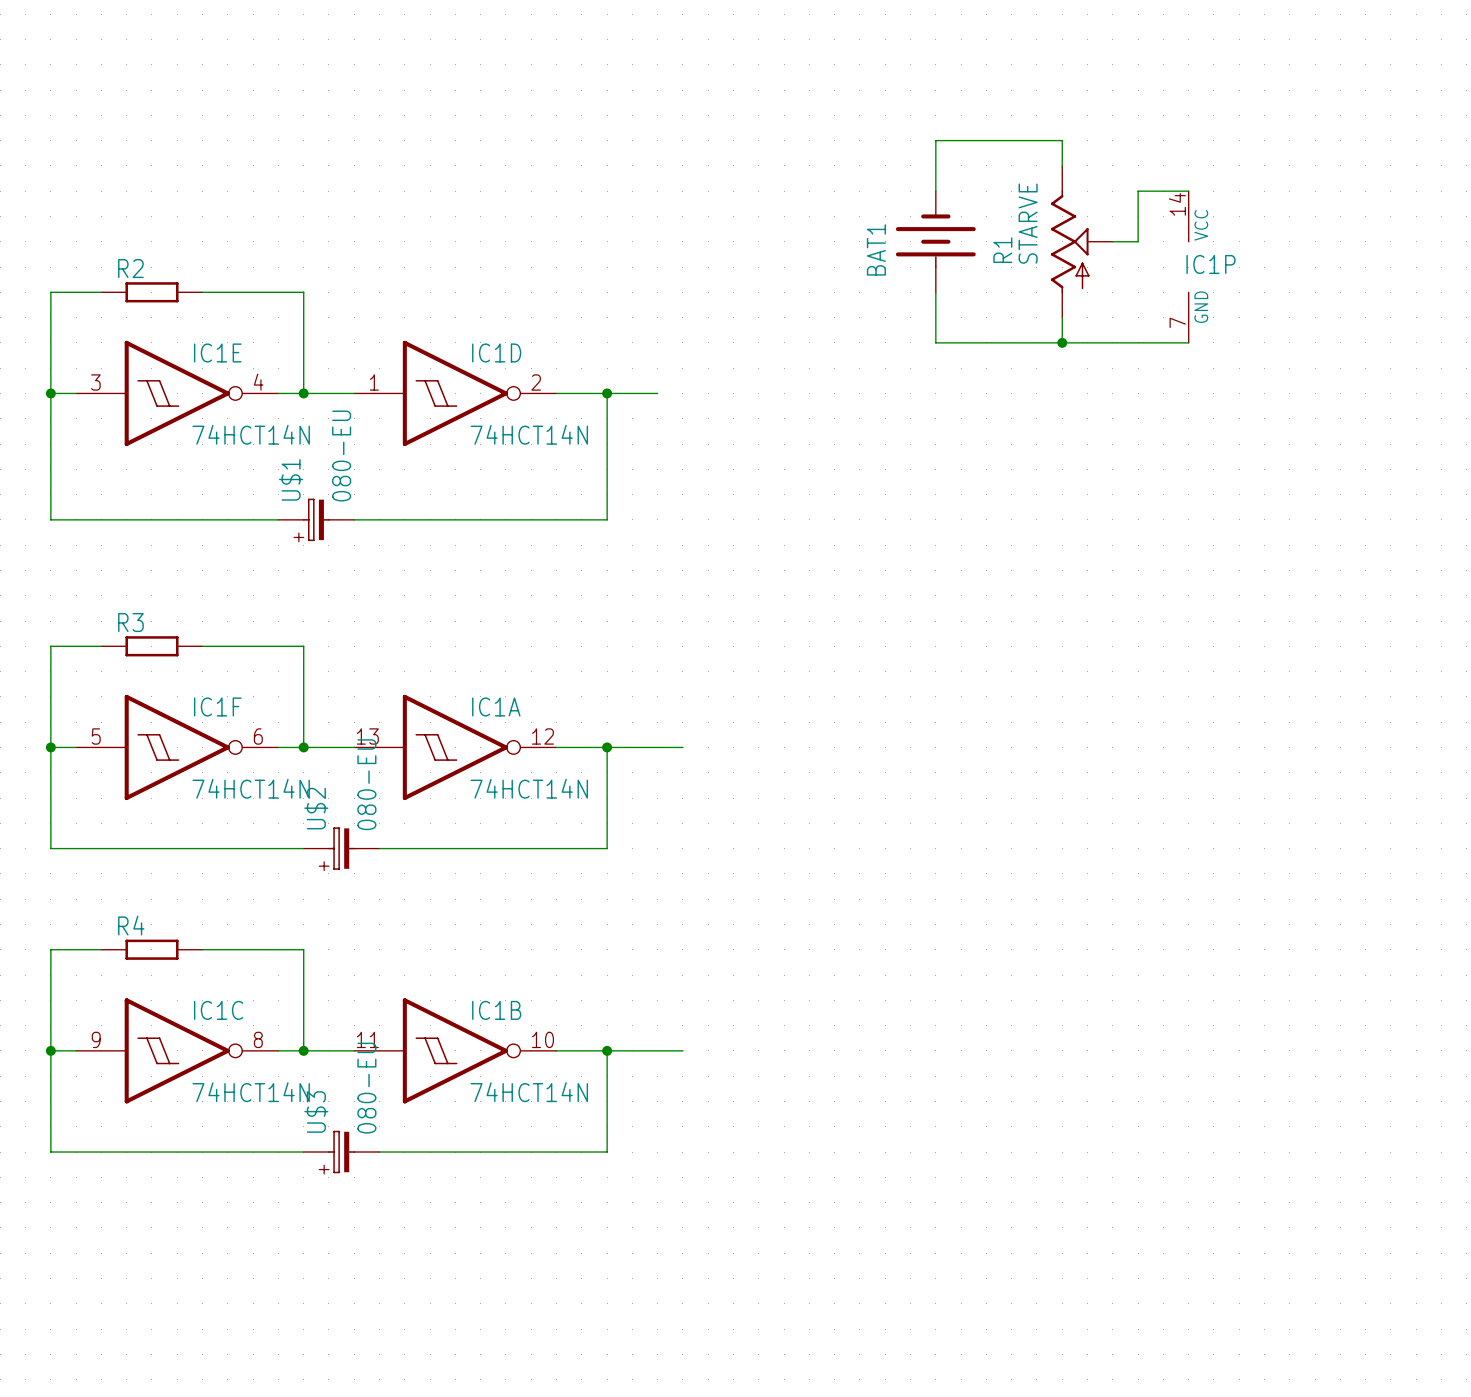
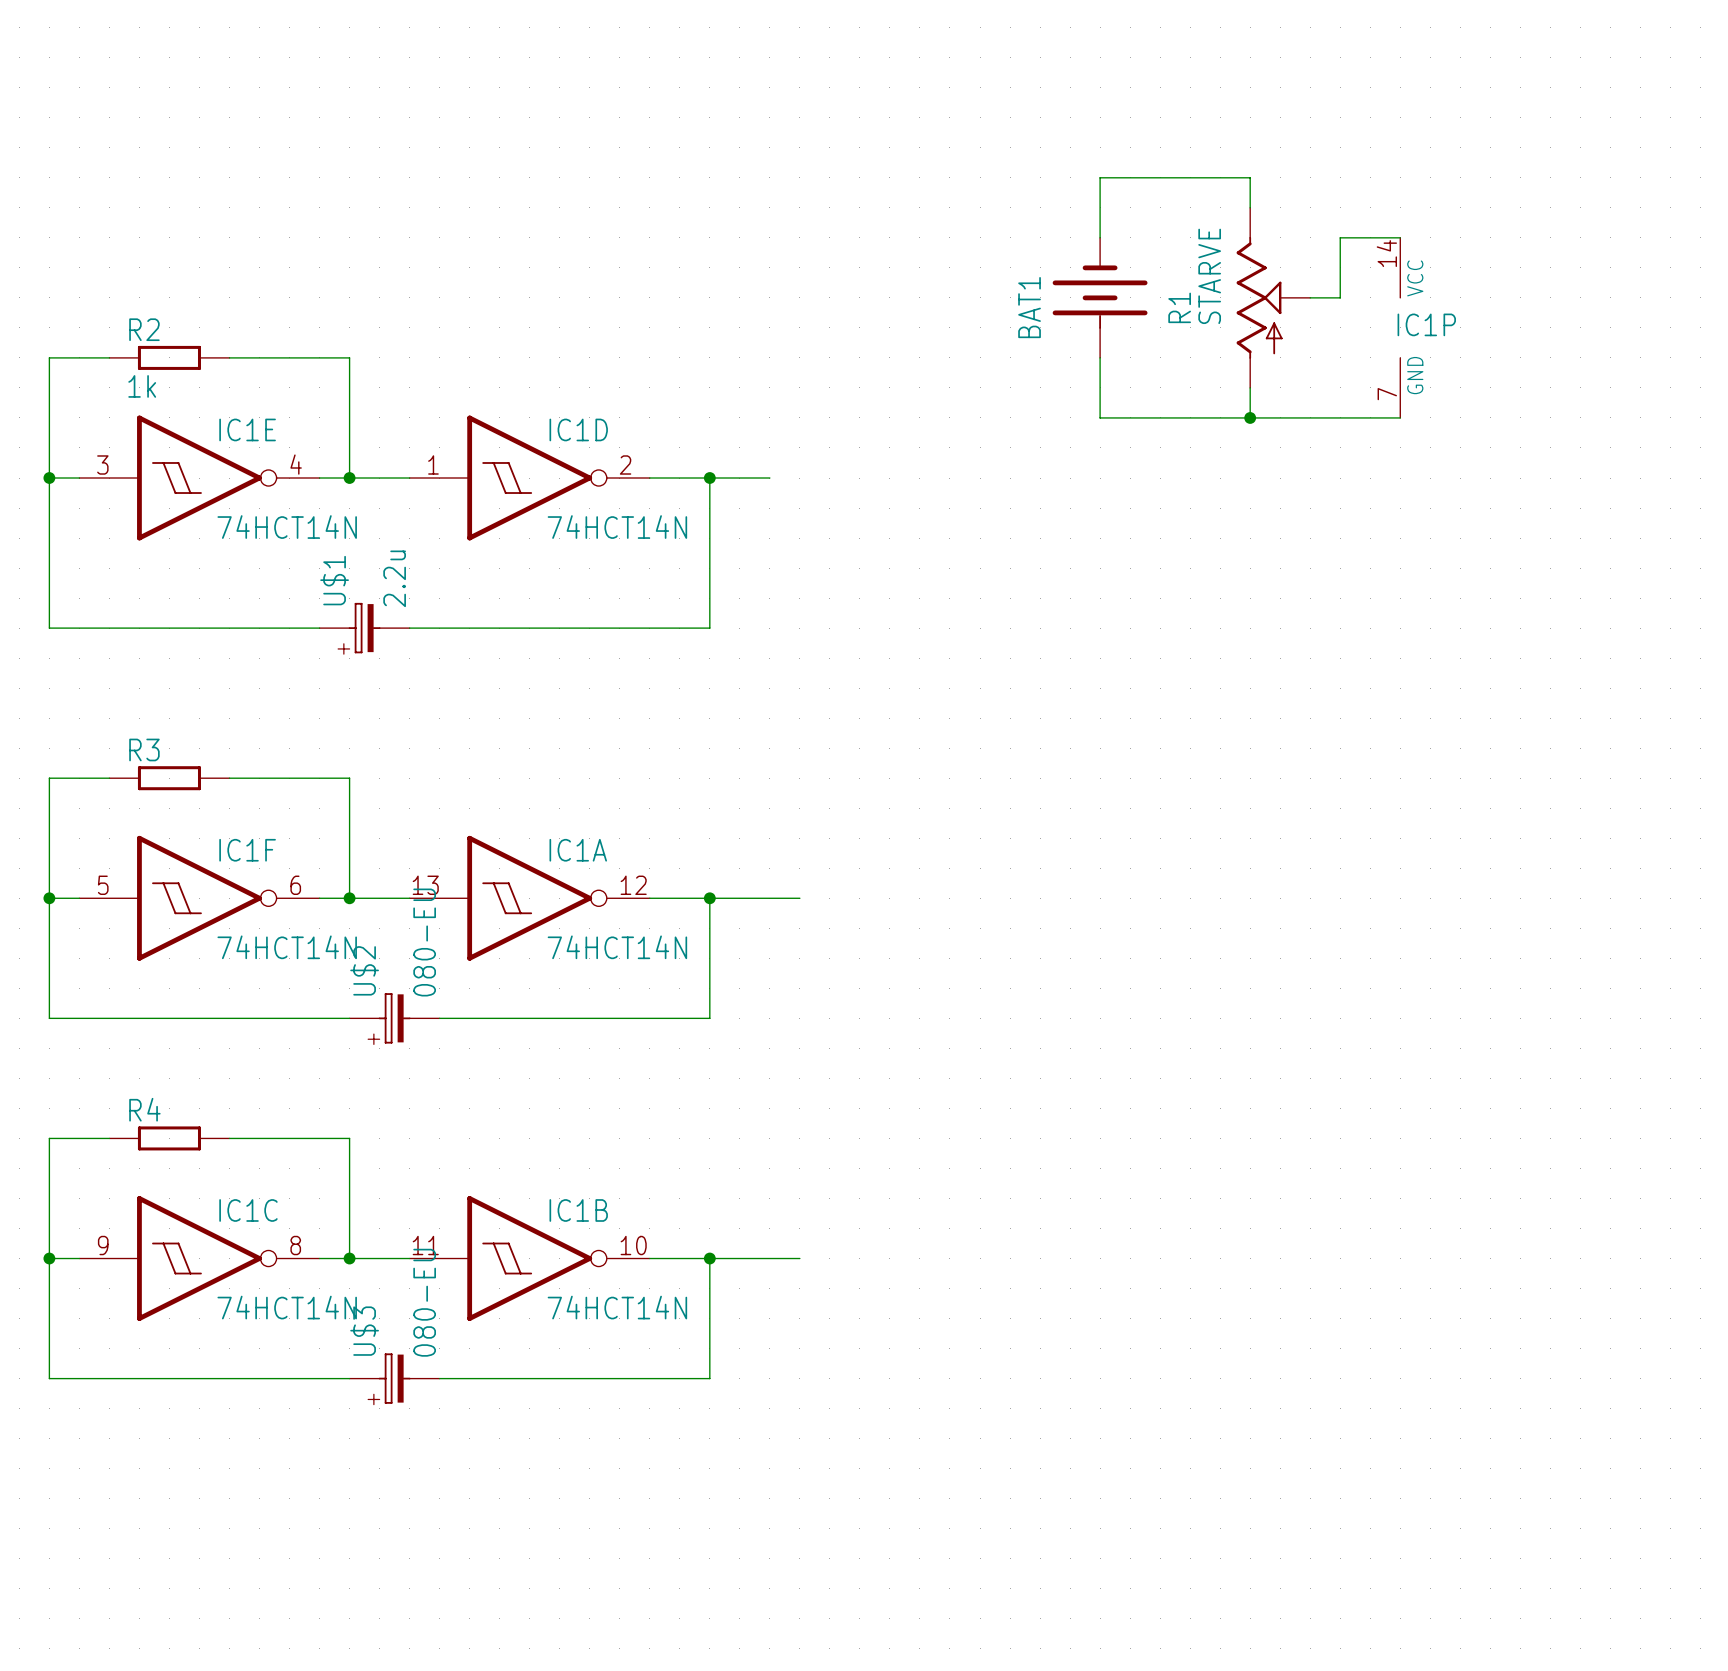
R2 value: none -> 1k (142, 386)
U$1 value: 080-EU (341, 455) -> 2.2u (394, 578)

